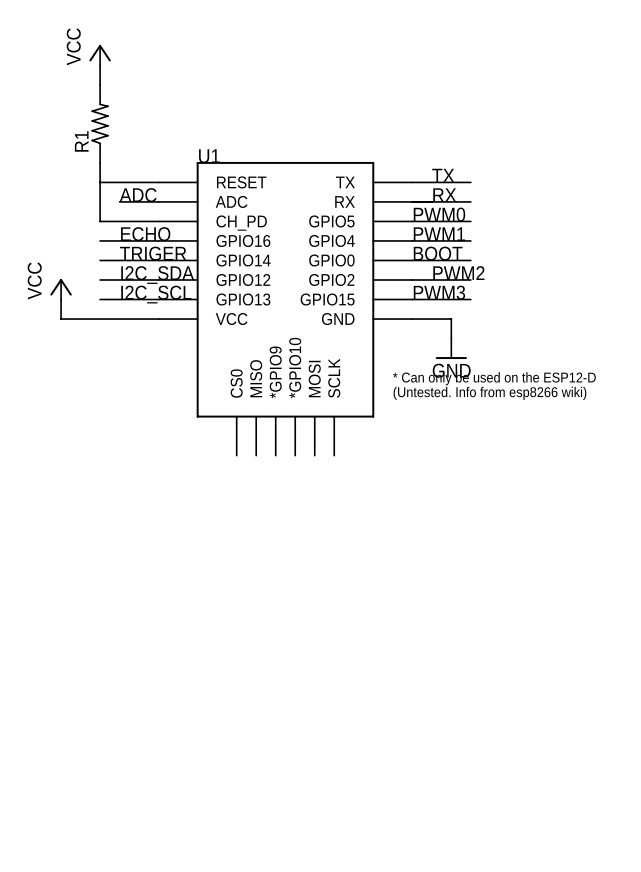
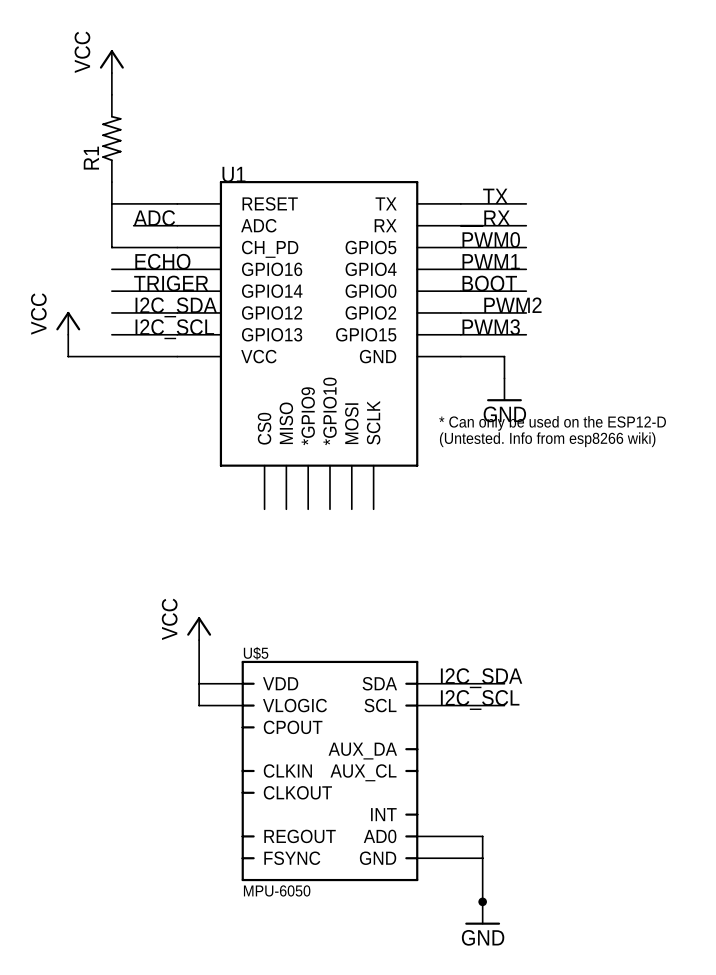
power symbol: none -> VCC (199, 628)
wire: none -> (199, 640) (199, 705) (242, 705)
label: none -> I2C_SDA (481, 678)
wire: none -> (199, 683) (242, 683)
wire: none -> (417, 683) (504, 683)
label: none -> I2C_SCL (480, 700)
wire: none -> (417, 705) (504, 705)
U$5: none -> MPU-6050 (329, 770)
wire: none -> (417, 836) (482, 836) (482, 901)
wire: none -> (417, 858) (482, 858)
junction: none -> (482, 901)
power symbol: none -> GND (482, 913)

